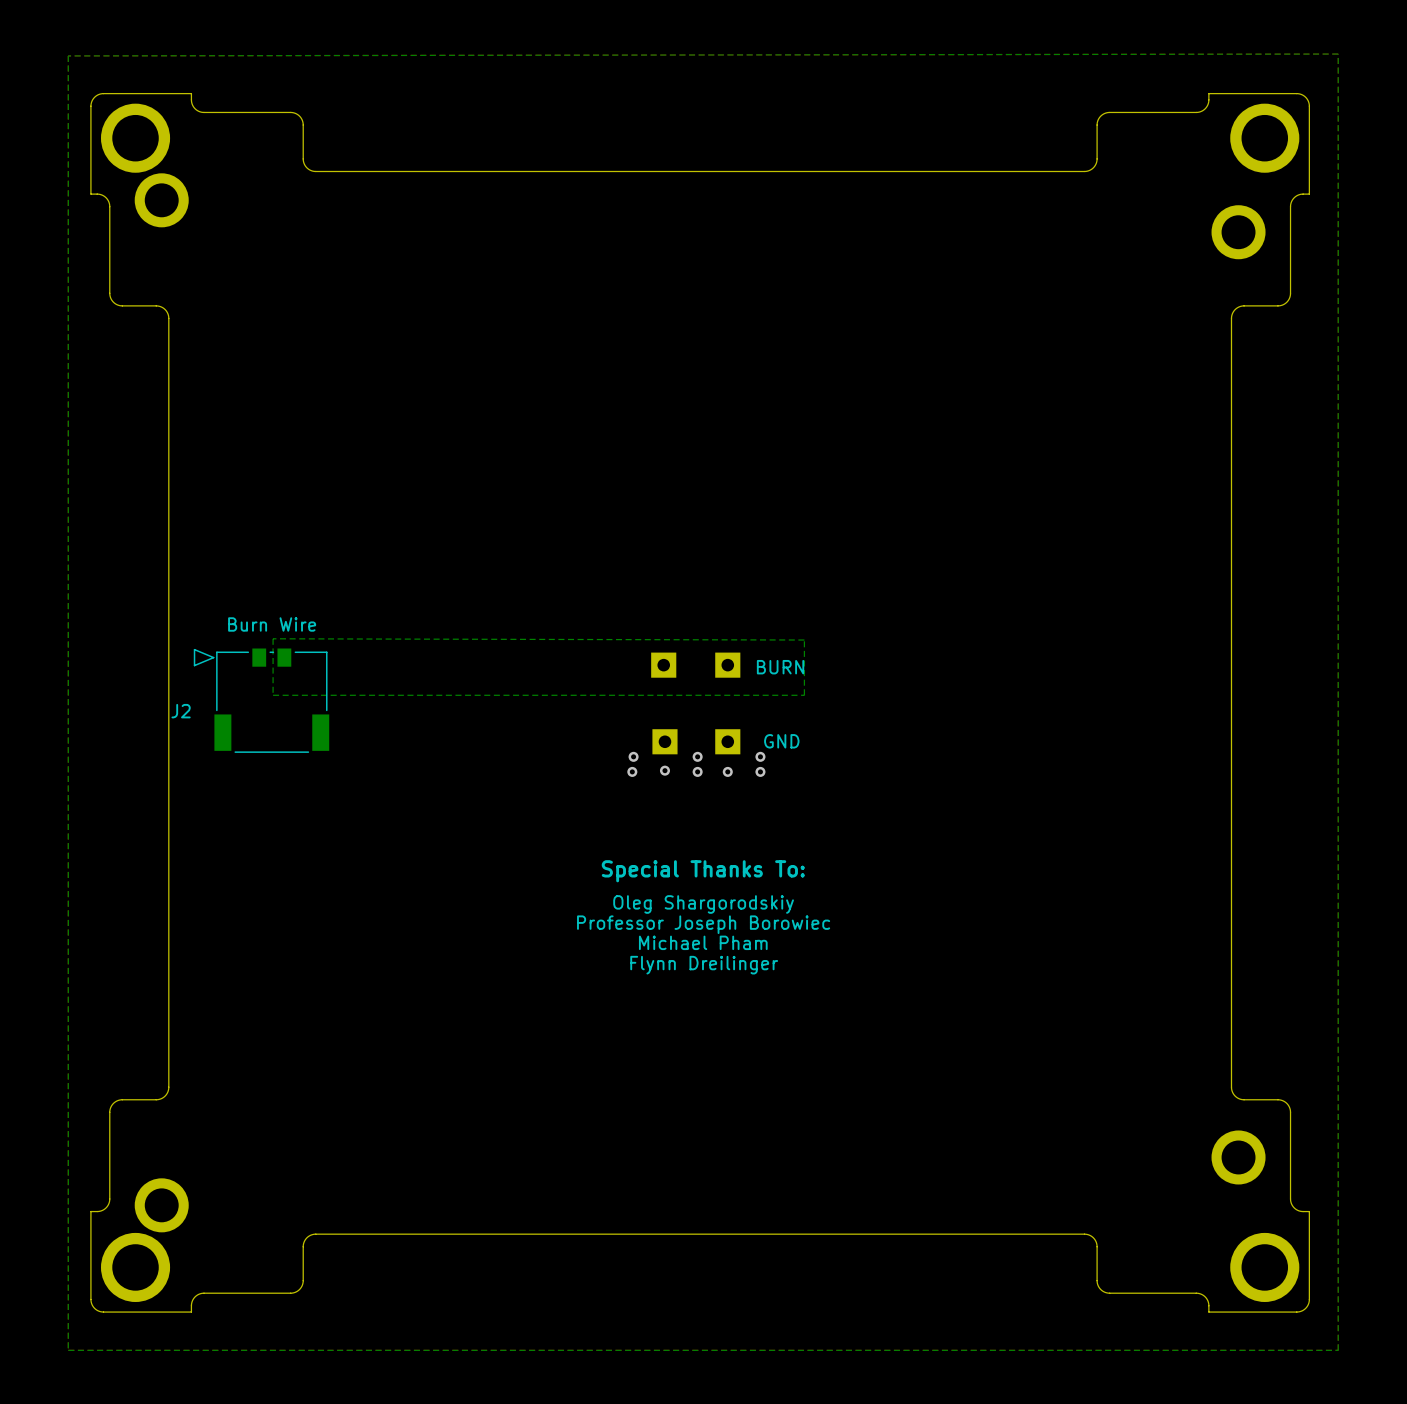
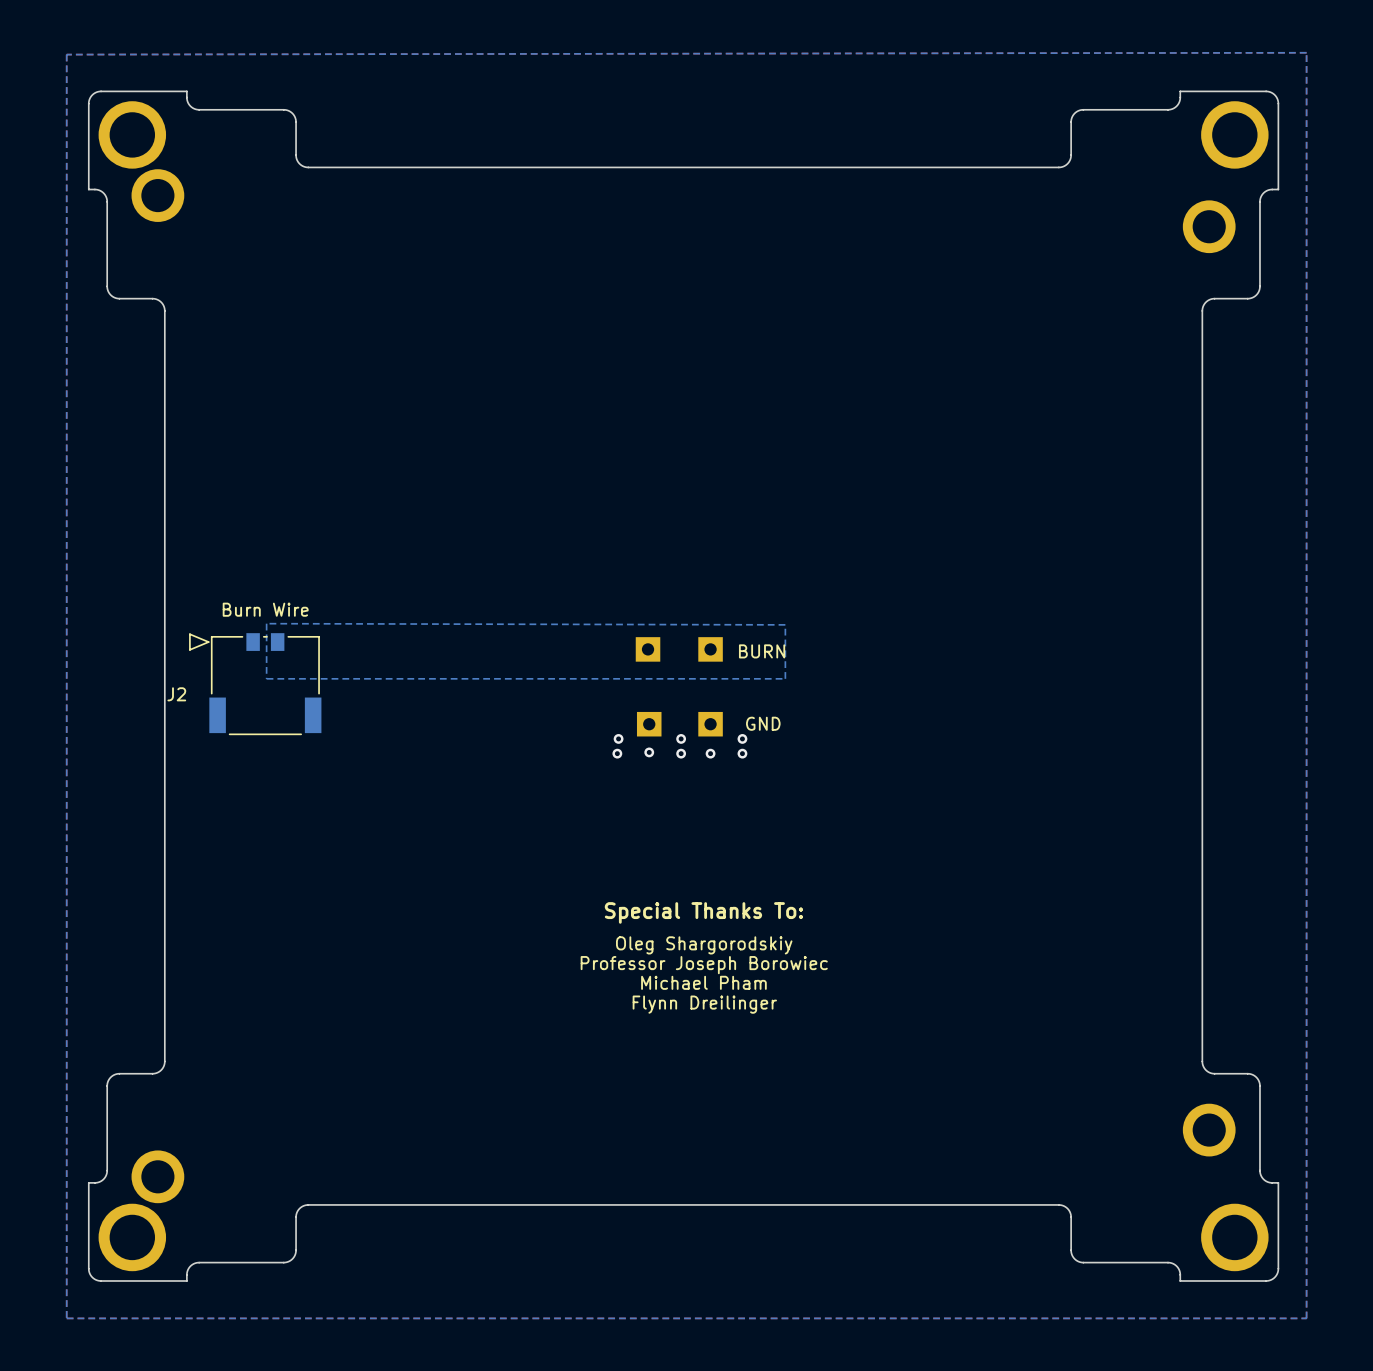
text position: Special Thanks To: (703, 871) -> Special Thanks To: (703, 912)
text position: Oleg Shargorodskiy (703, 904) -> Oleg Shargorodskiy (704, 945)
text position: Professor Joseph Borowiec (703, 924) -> Professor Joseph Borowiec (704, 965)
text position: Michael Pham (703, 942) -> Michael Pham (703, 982)
text position: Flynn Dreilinger (704, 965) -> Flynn Dreilinger (704, 1004)

